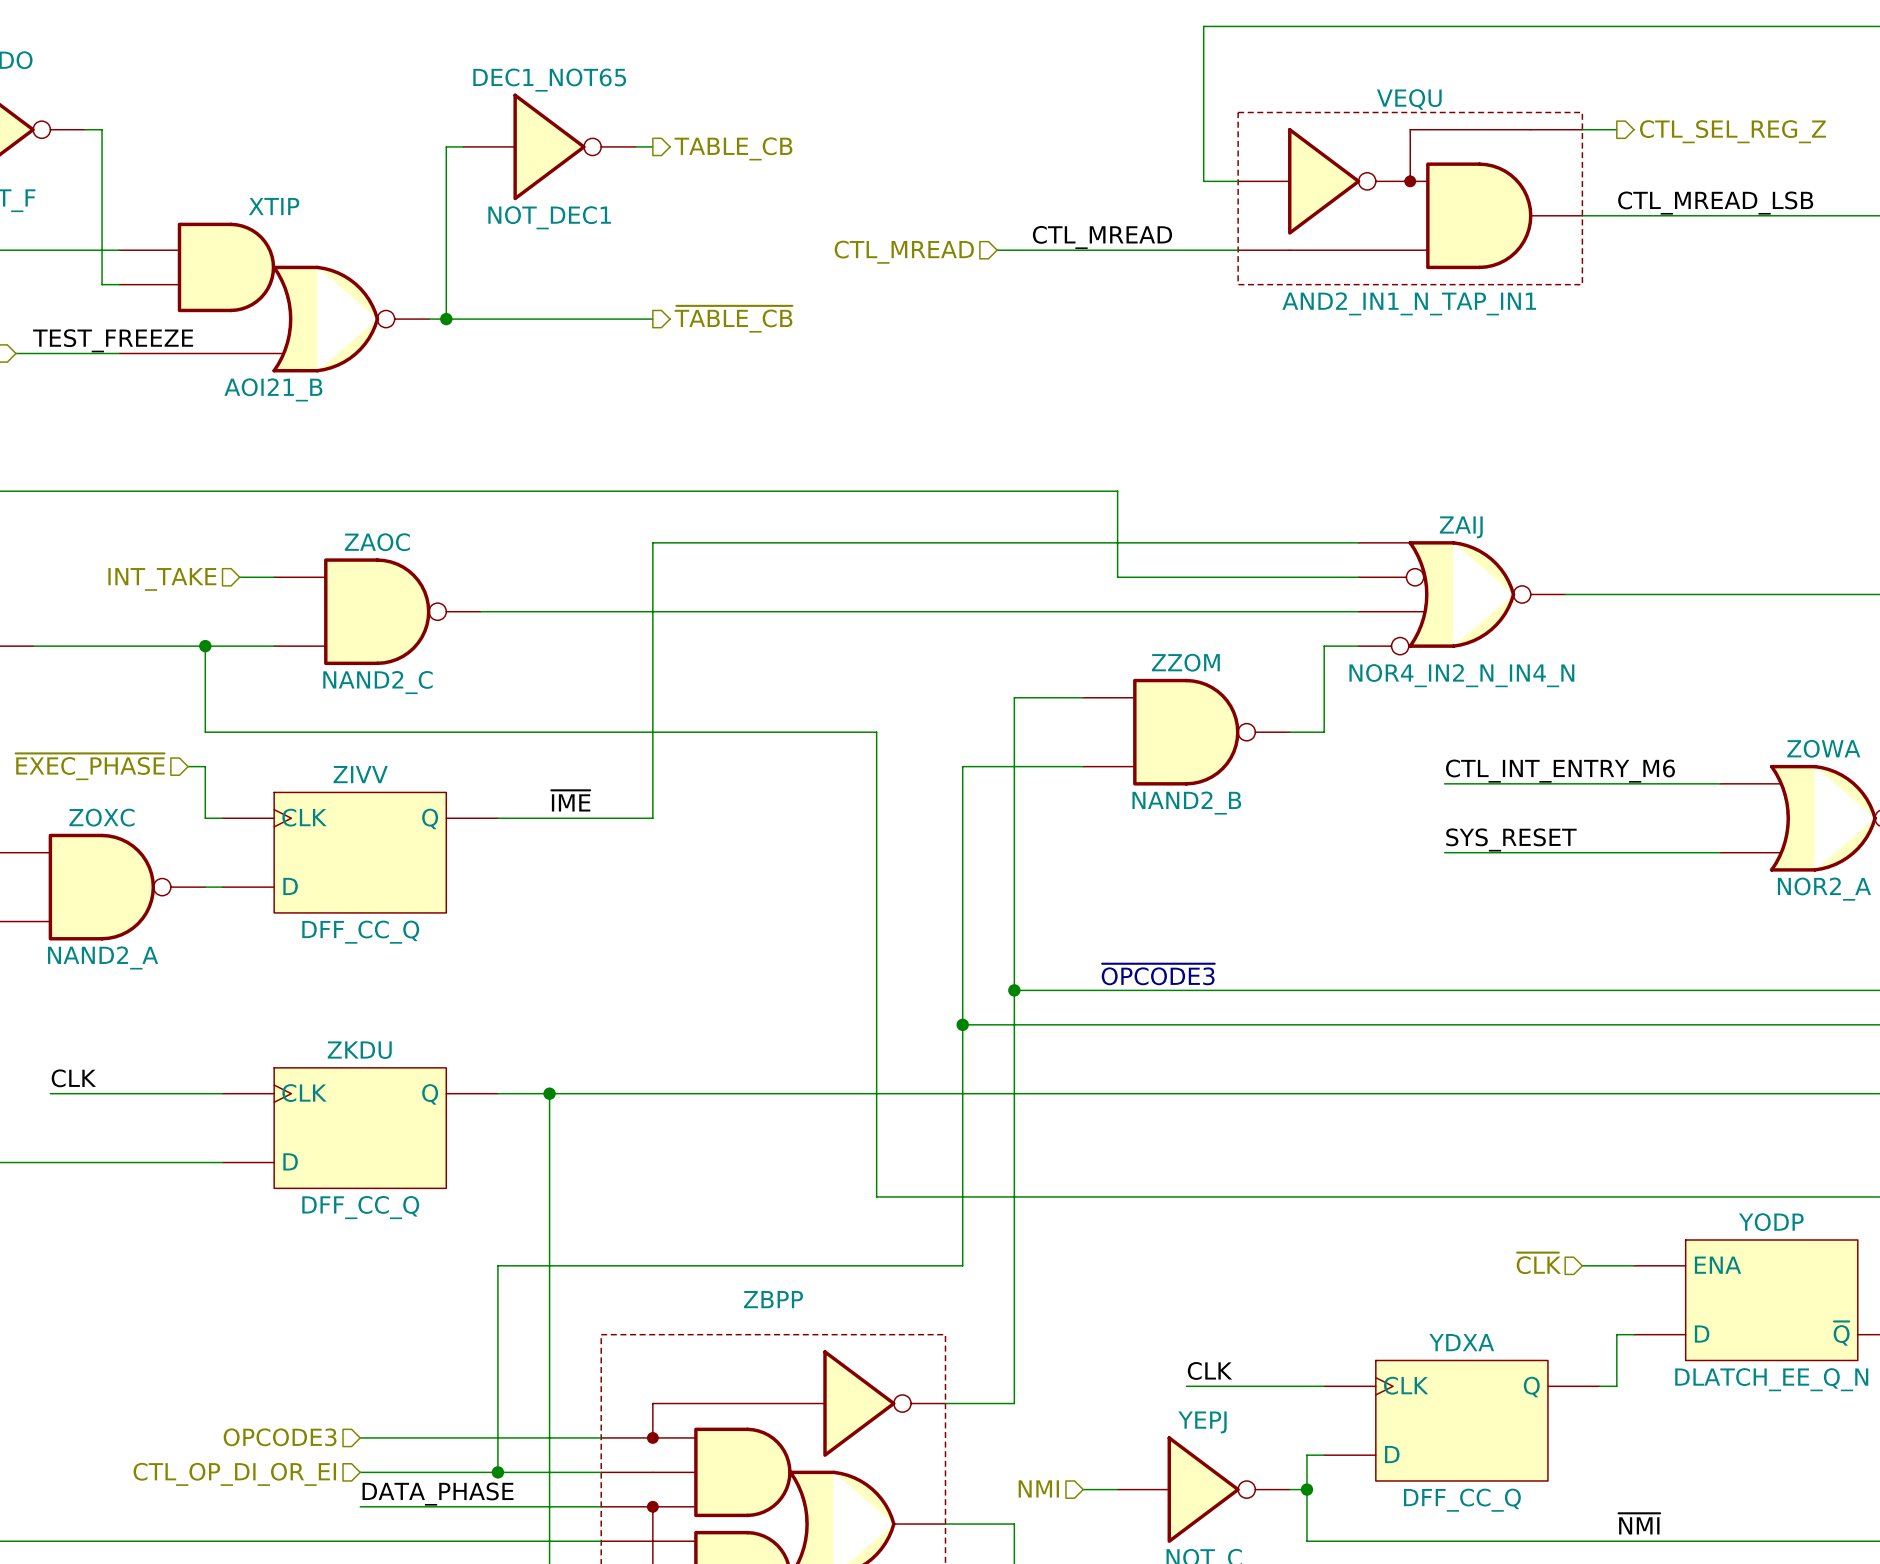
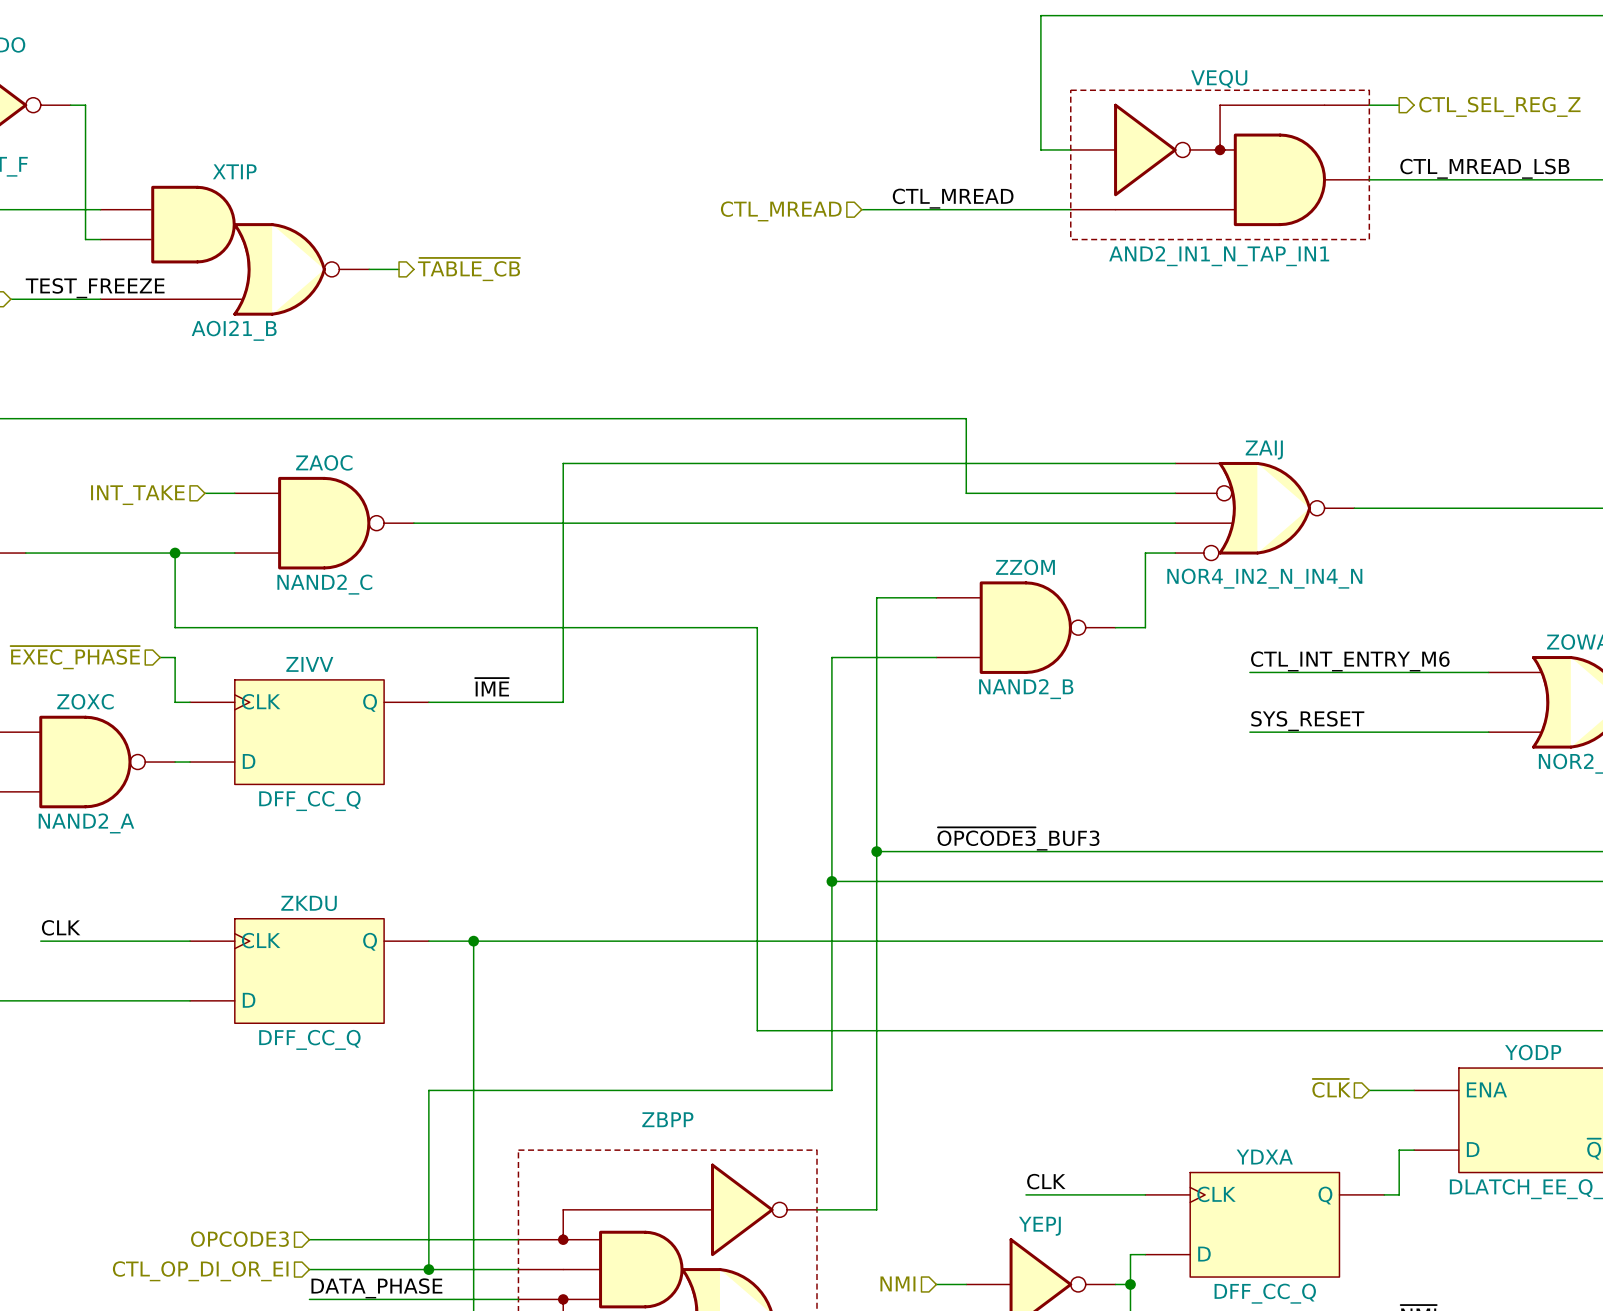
wire: (463, 146) (446, 146) (446, 319) -> none
DEC1_NOT65: NOT_DEC1 (549, 146) -> none
wire: (635, 146) (652, 146) -> none
hierarchical label: TABLE_CB (733, 148) -> none
junction: (446, 319) -> none
wire: (463, 319) (652, 319) -> none
hierarchical label position: ~{TABLE_CB} (733, 319) -> ~{TABLE_CB} (468, 269)
text: ~{OPCODE3} (1158, 974) -> none
label: none -> ~{OPCODE3}_BUF3 (1018, 838)

